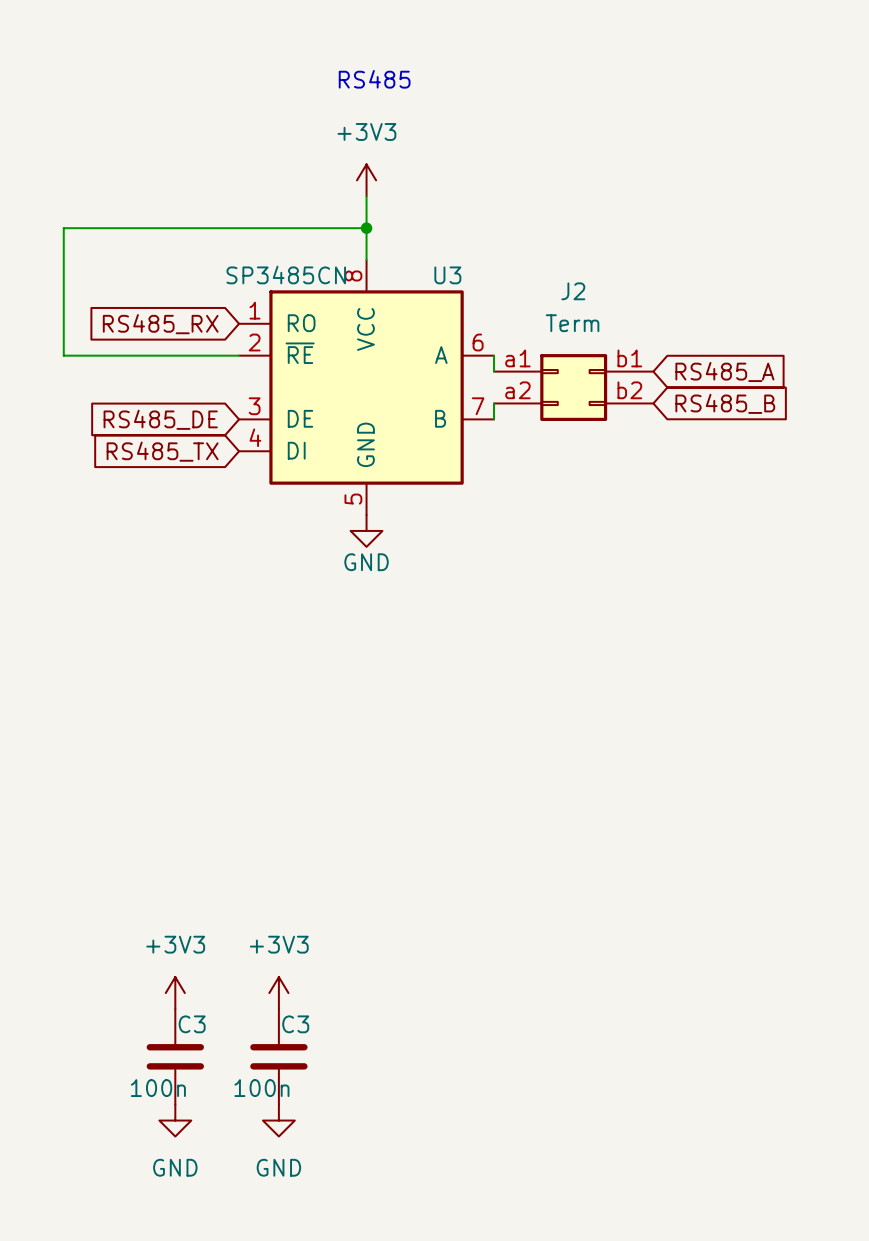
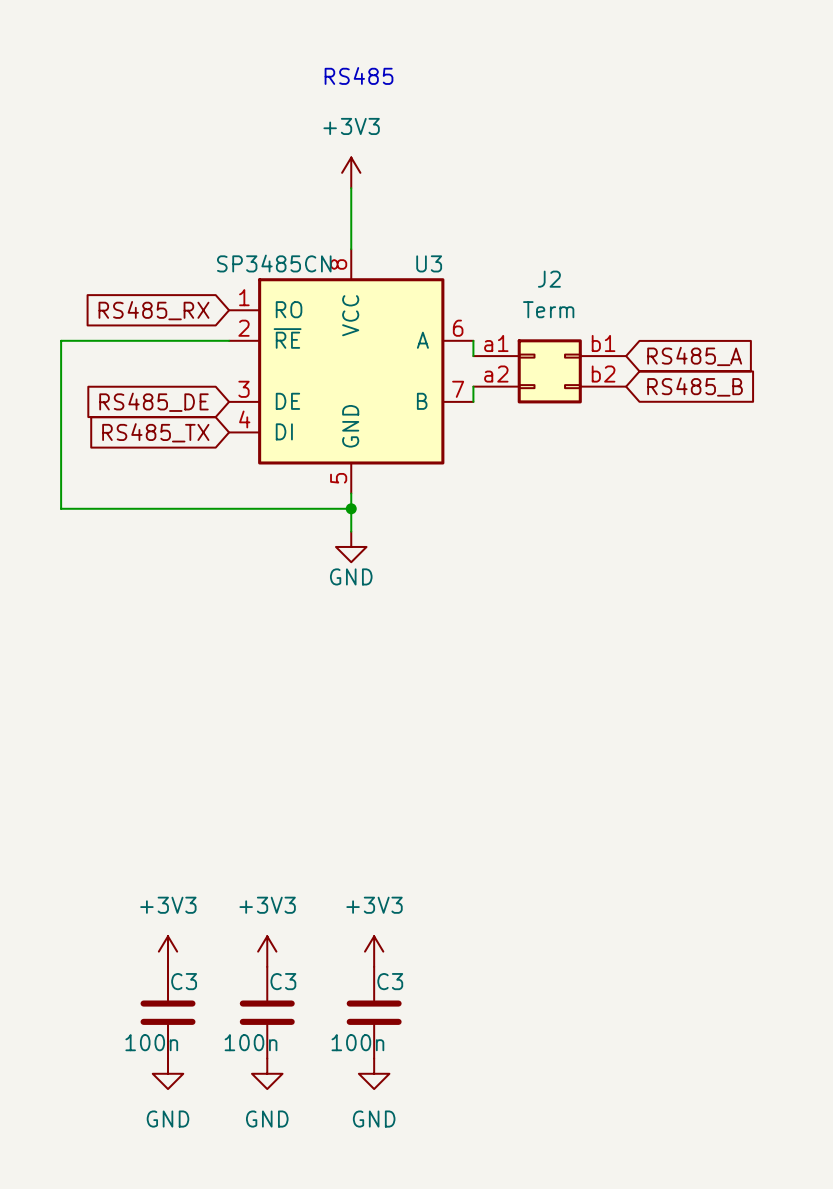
wire: (366, 228) (63, 228) (63, 355) -> (351, 508) (61, 508) (61, 340)
junction: (366, 228) -> none
wire: none -> (351, 493) (351, 531)
junction: none -> (351, 508)
power symbol position: GND (366, 530) -> GND (351, 546)
power symbol: none -> +3V3 (374, 951)
C3: none -> 100n (374, 1012)
power symbol: none -> GND (374, 1073)

